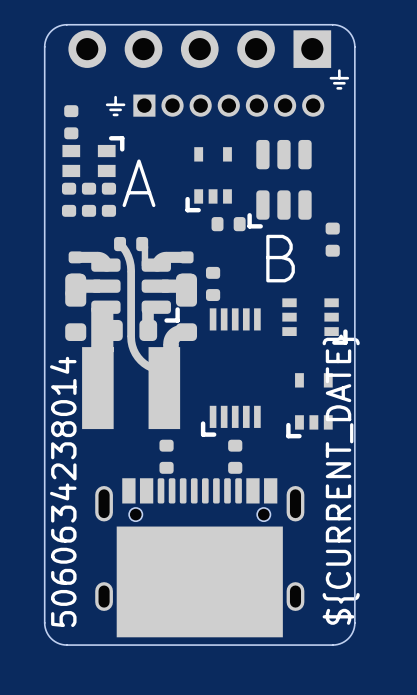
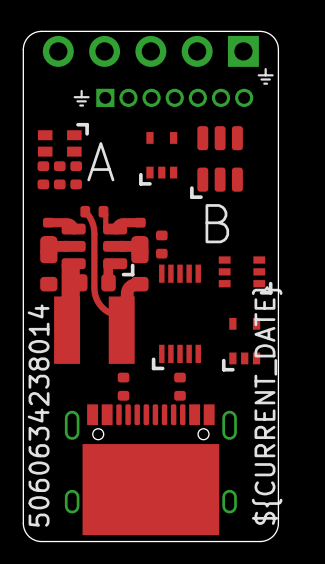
part: (71, 122) -> none
part: (228, 224) -> none
part: (332, 239) -> none

